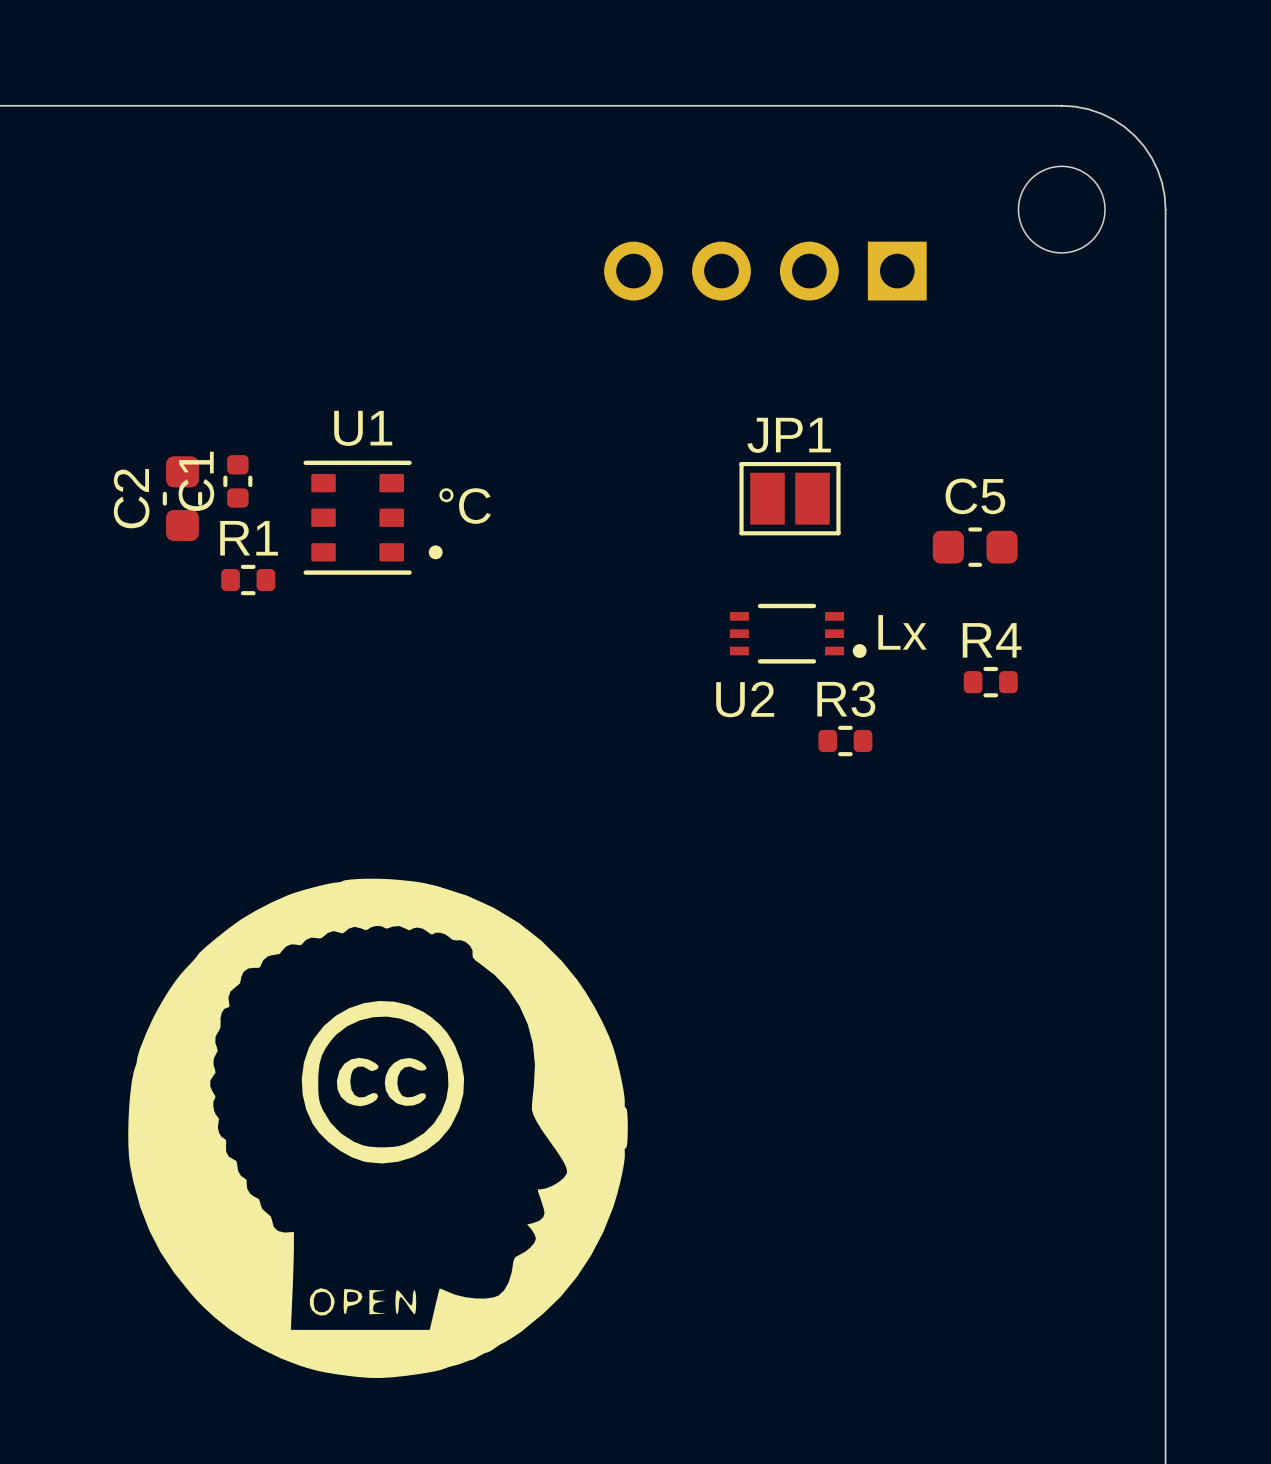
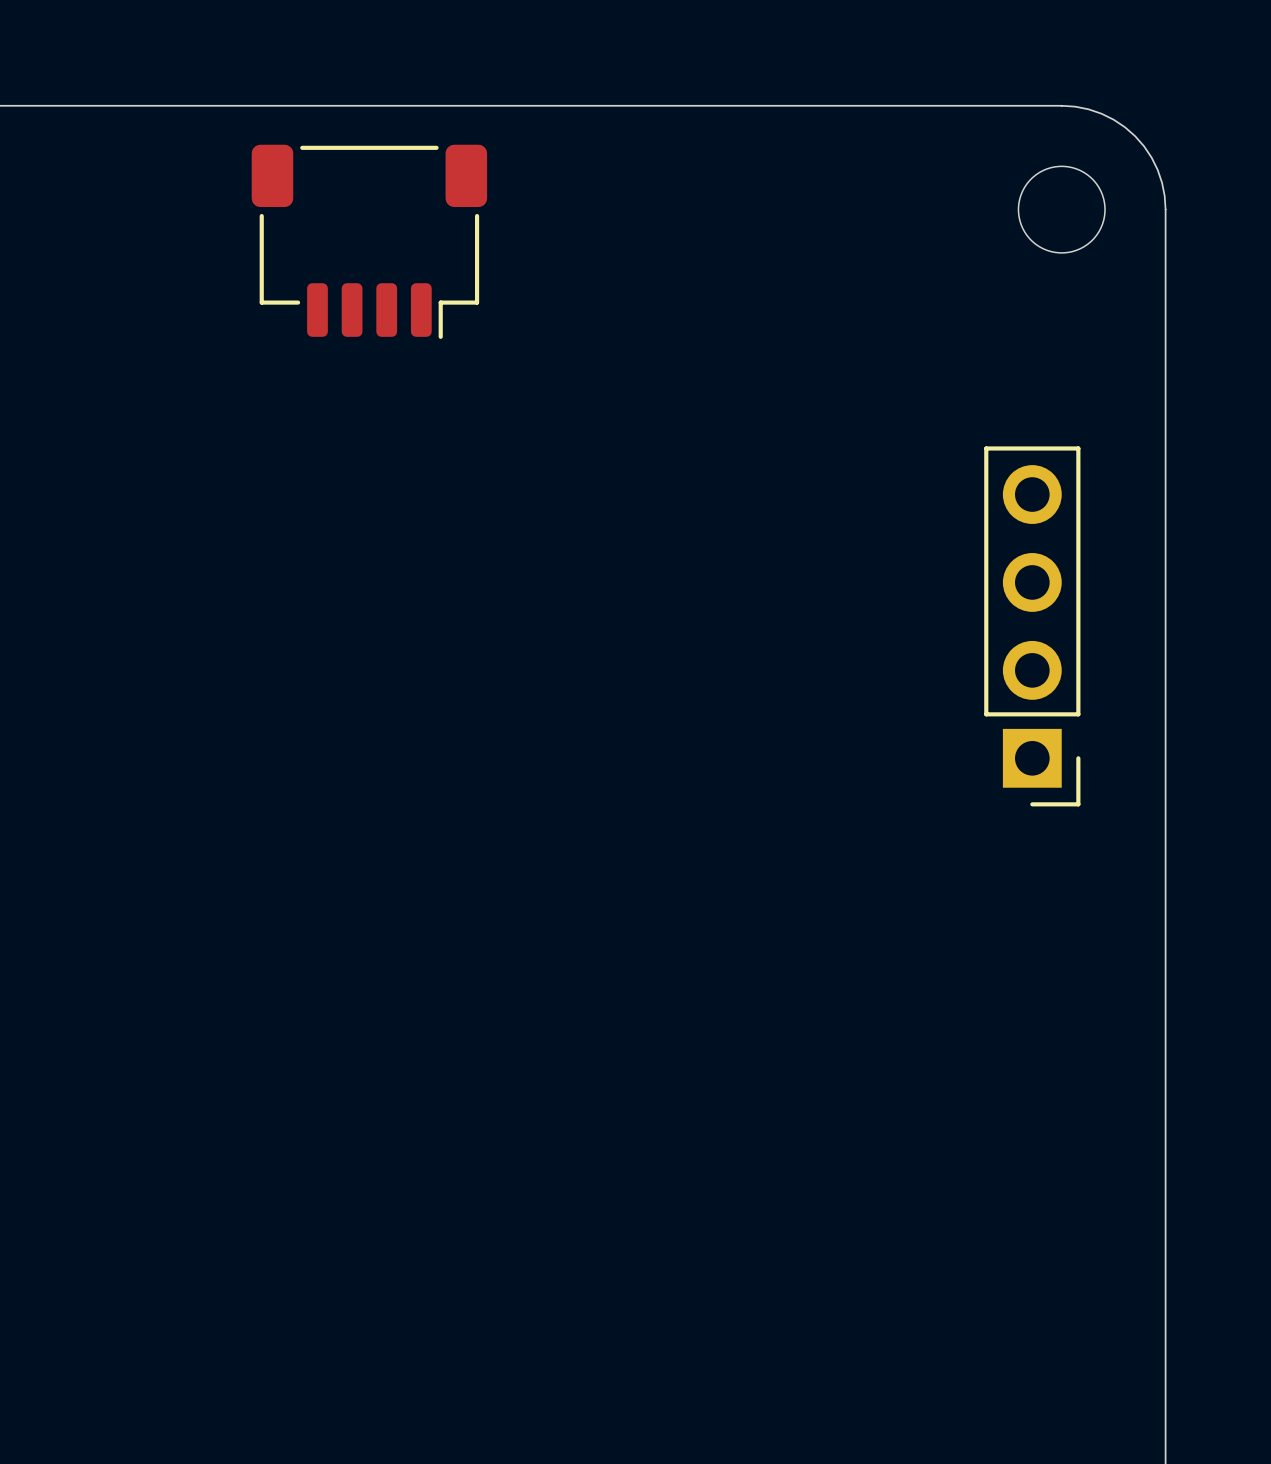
part: none -> (369, 241)
part side: bottom (765, 271) -> top (1032, 626)
C1: (237, 481) -> none
C2: (182, 498) -> none
JP1: (790, 498) -> none
text: °C (465, 506) -> none
U1: (373, 517) -> none
C5: (975, 547) -> none
R1: (248, 580) -> none
text: Lx (902, 632) -> none
U2: (798, 633) -> none
R4: (990, 682) -> none
R3: (845, 741) -> none
drawing: [128, 878, 628, 1379] -> none

